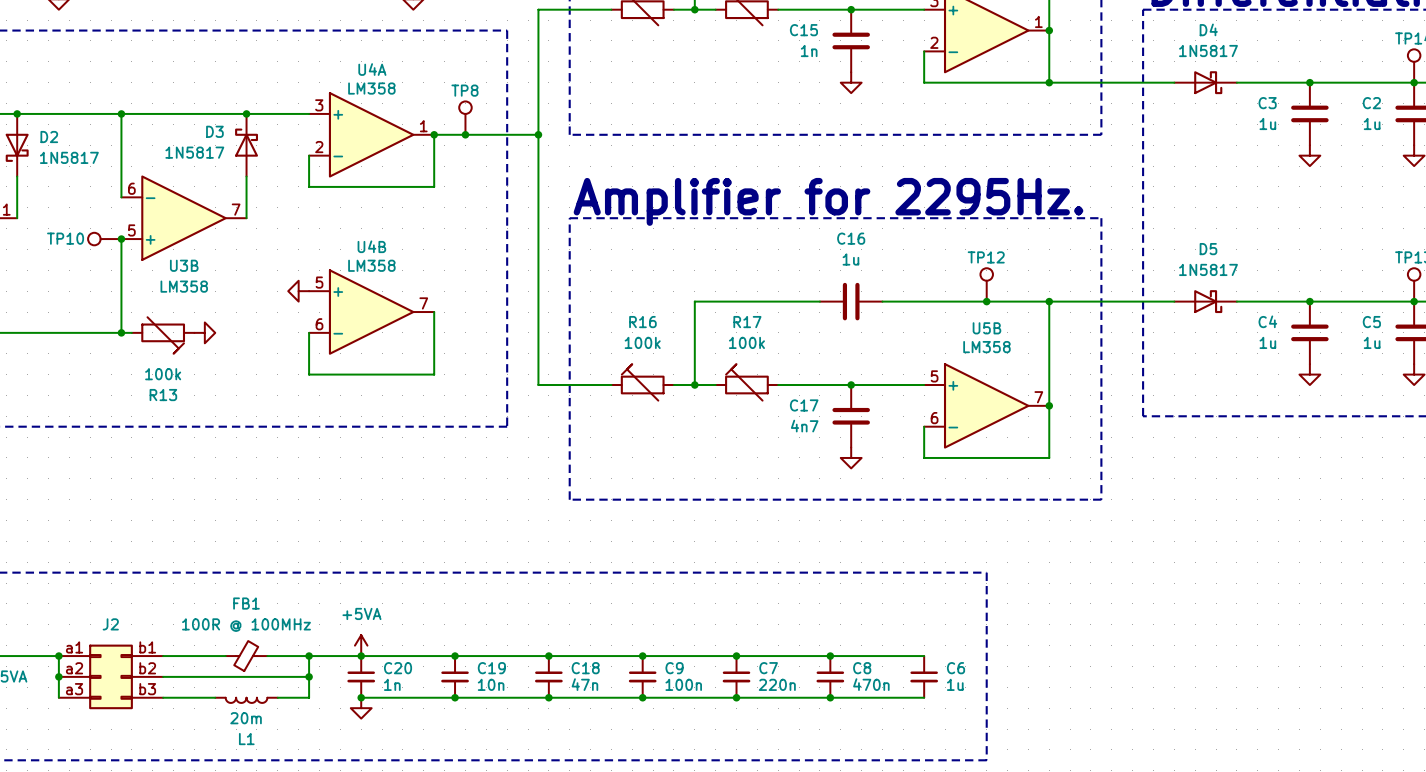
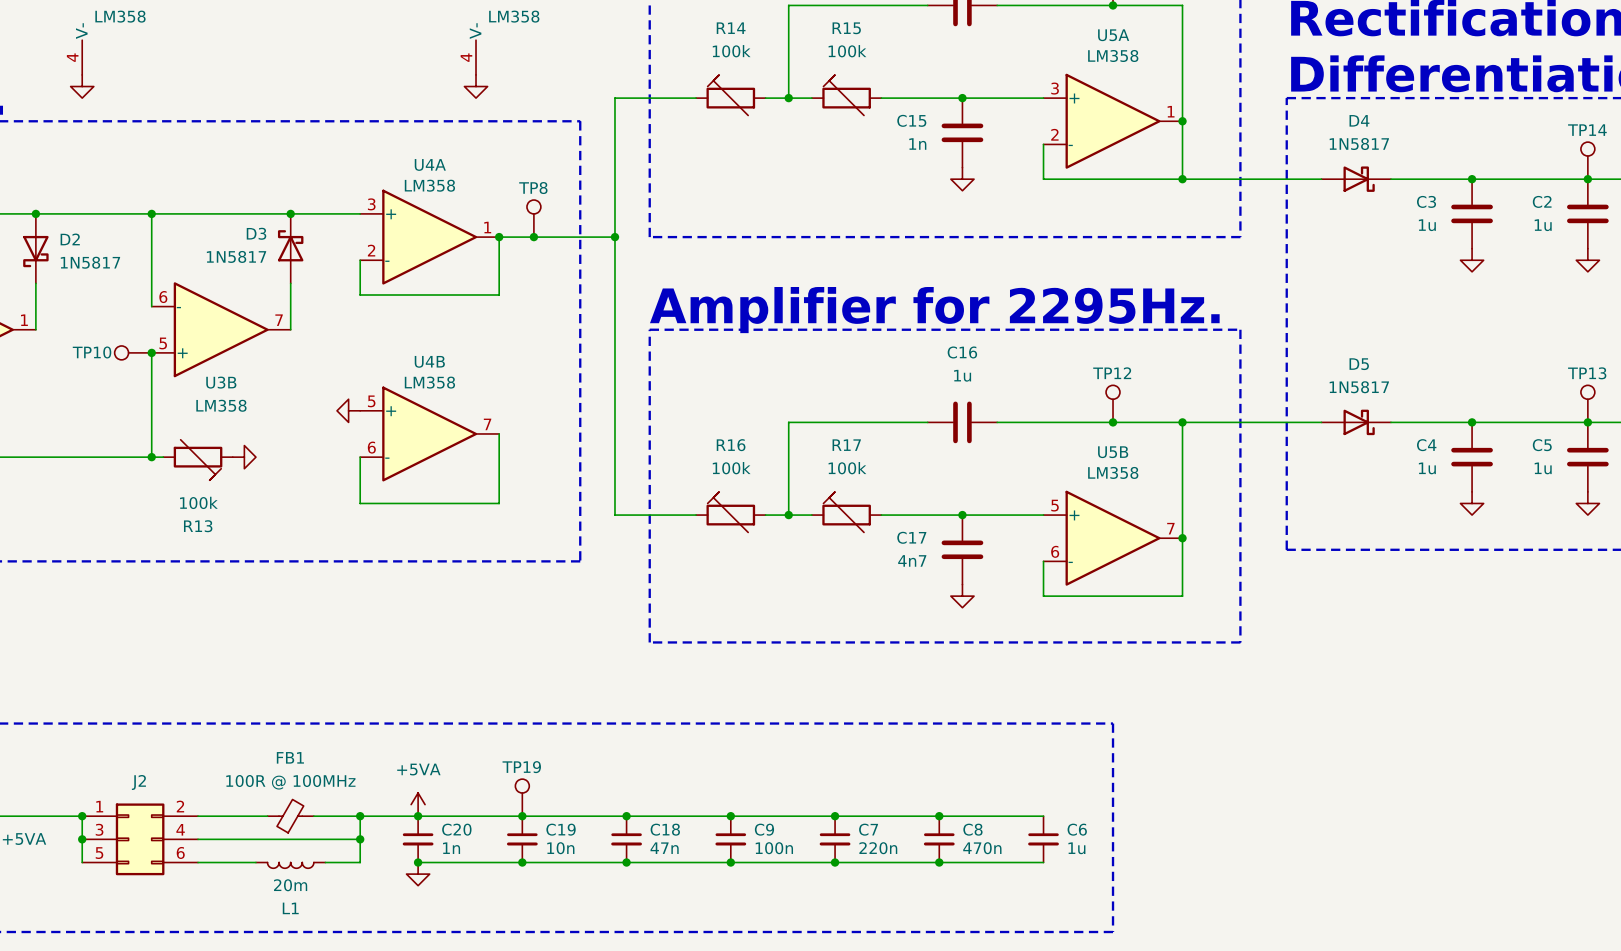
TP19: none -> (522, 797)
J2 pin number: a1 (74, 647) -> 1 (99, 806)
J2 pin number: b1 (147, 647) -> 2 (180, 806)
J2 pin number: a2 (74, 668) -> 3 (99, 829)
J2 pin number: b2 (147, 668) -> 4 (180, 829)
J2 pin number: a3 (74, 689) -> 5 (99, 853)
J2 pin number: b3 (147, 689) -> 6 (180, 852)

